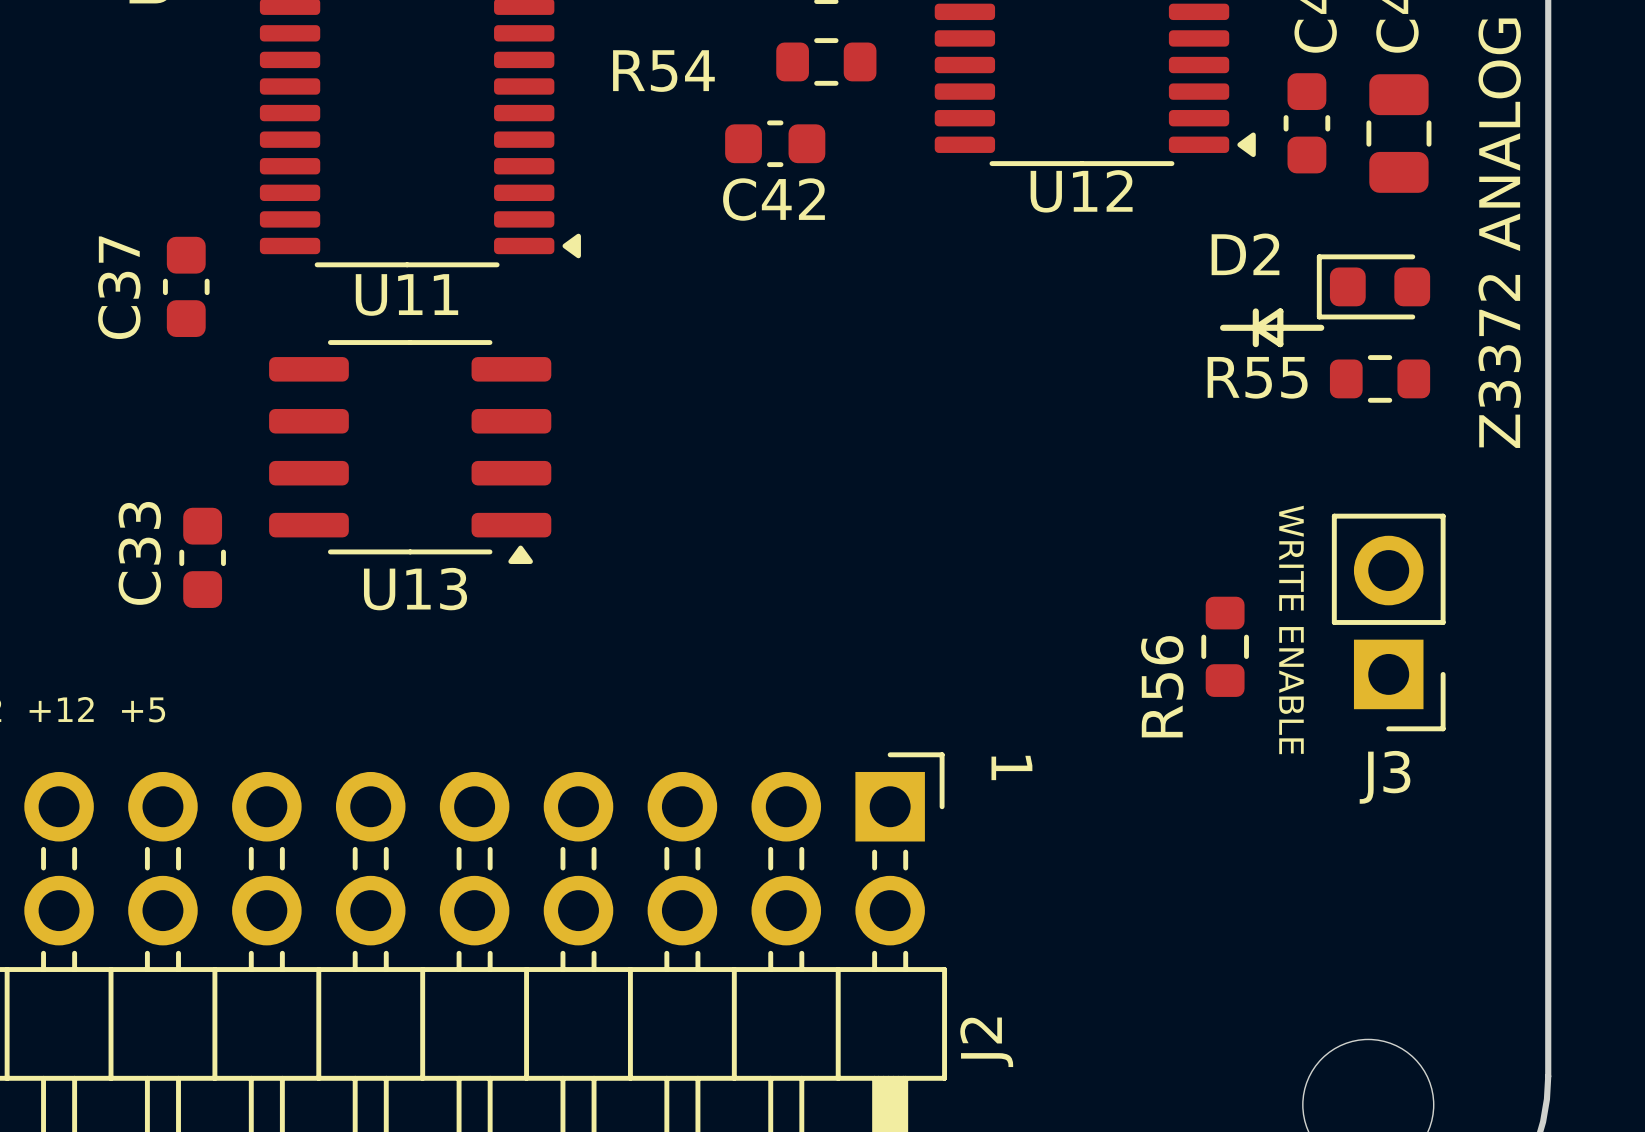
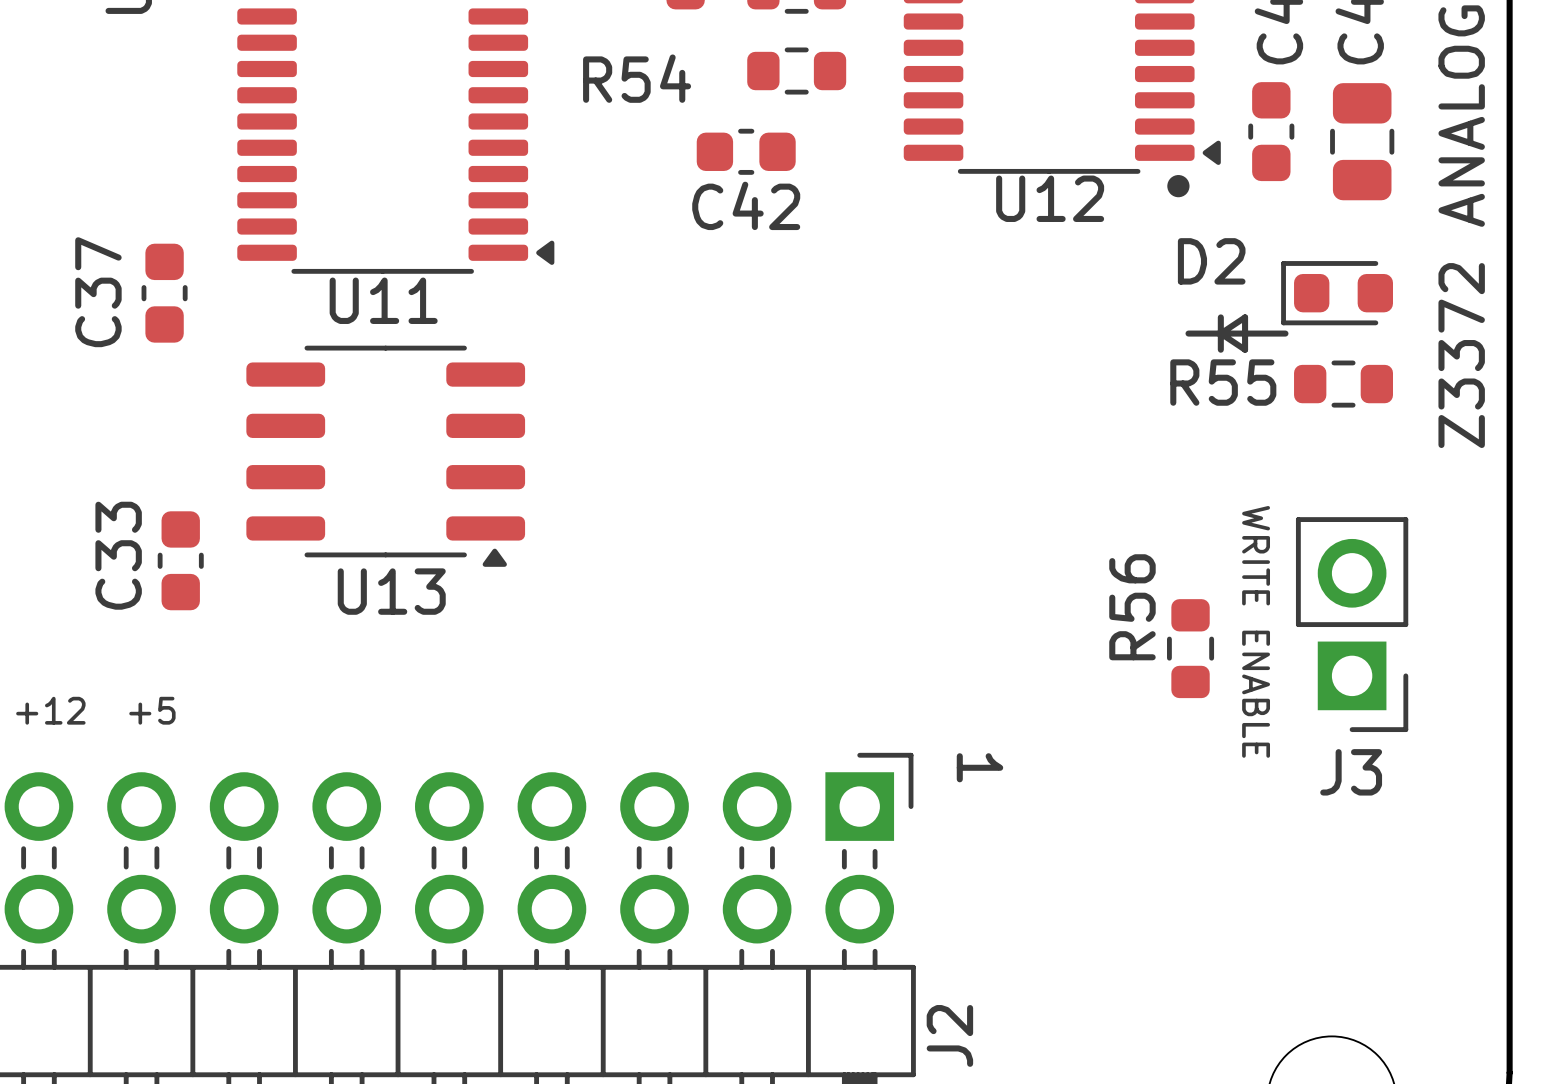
drawing: none -> [1167, 175, 1190, 198]
R56 name position: R56 (1162, 686) -> R56 (1132, 607)

